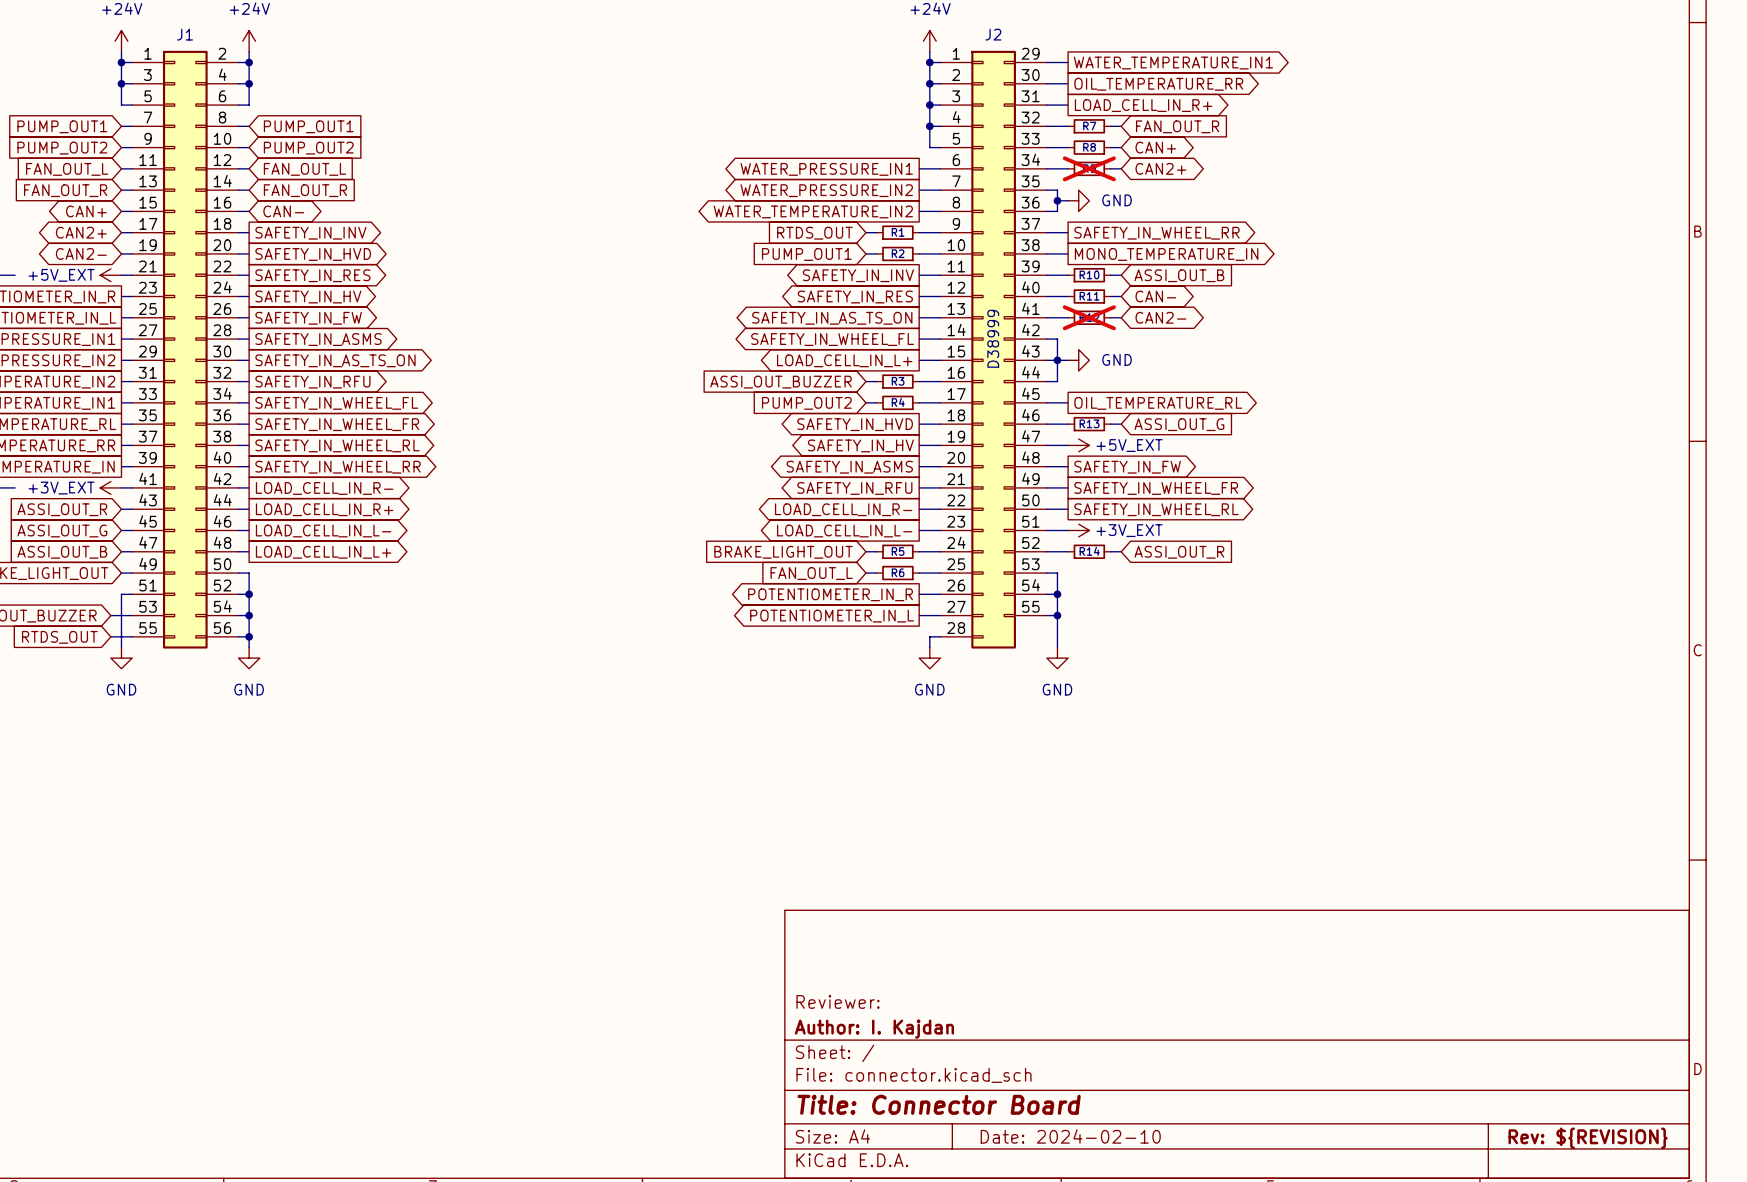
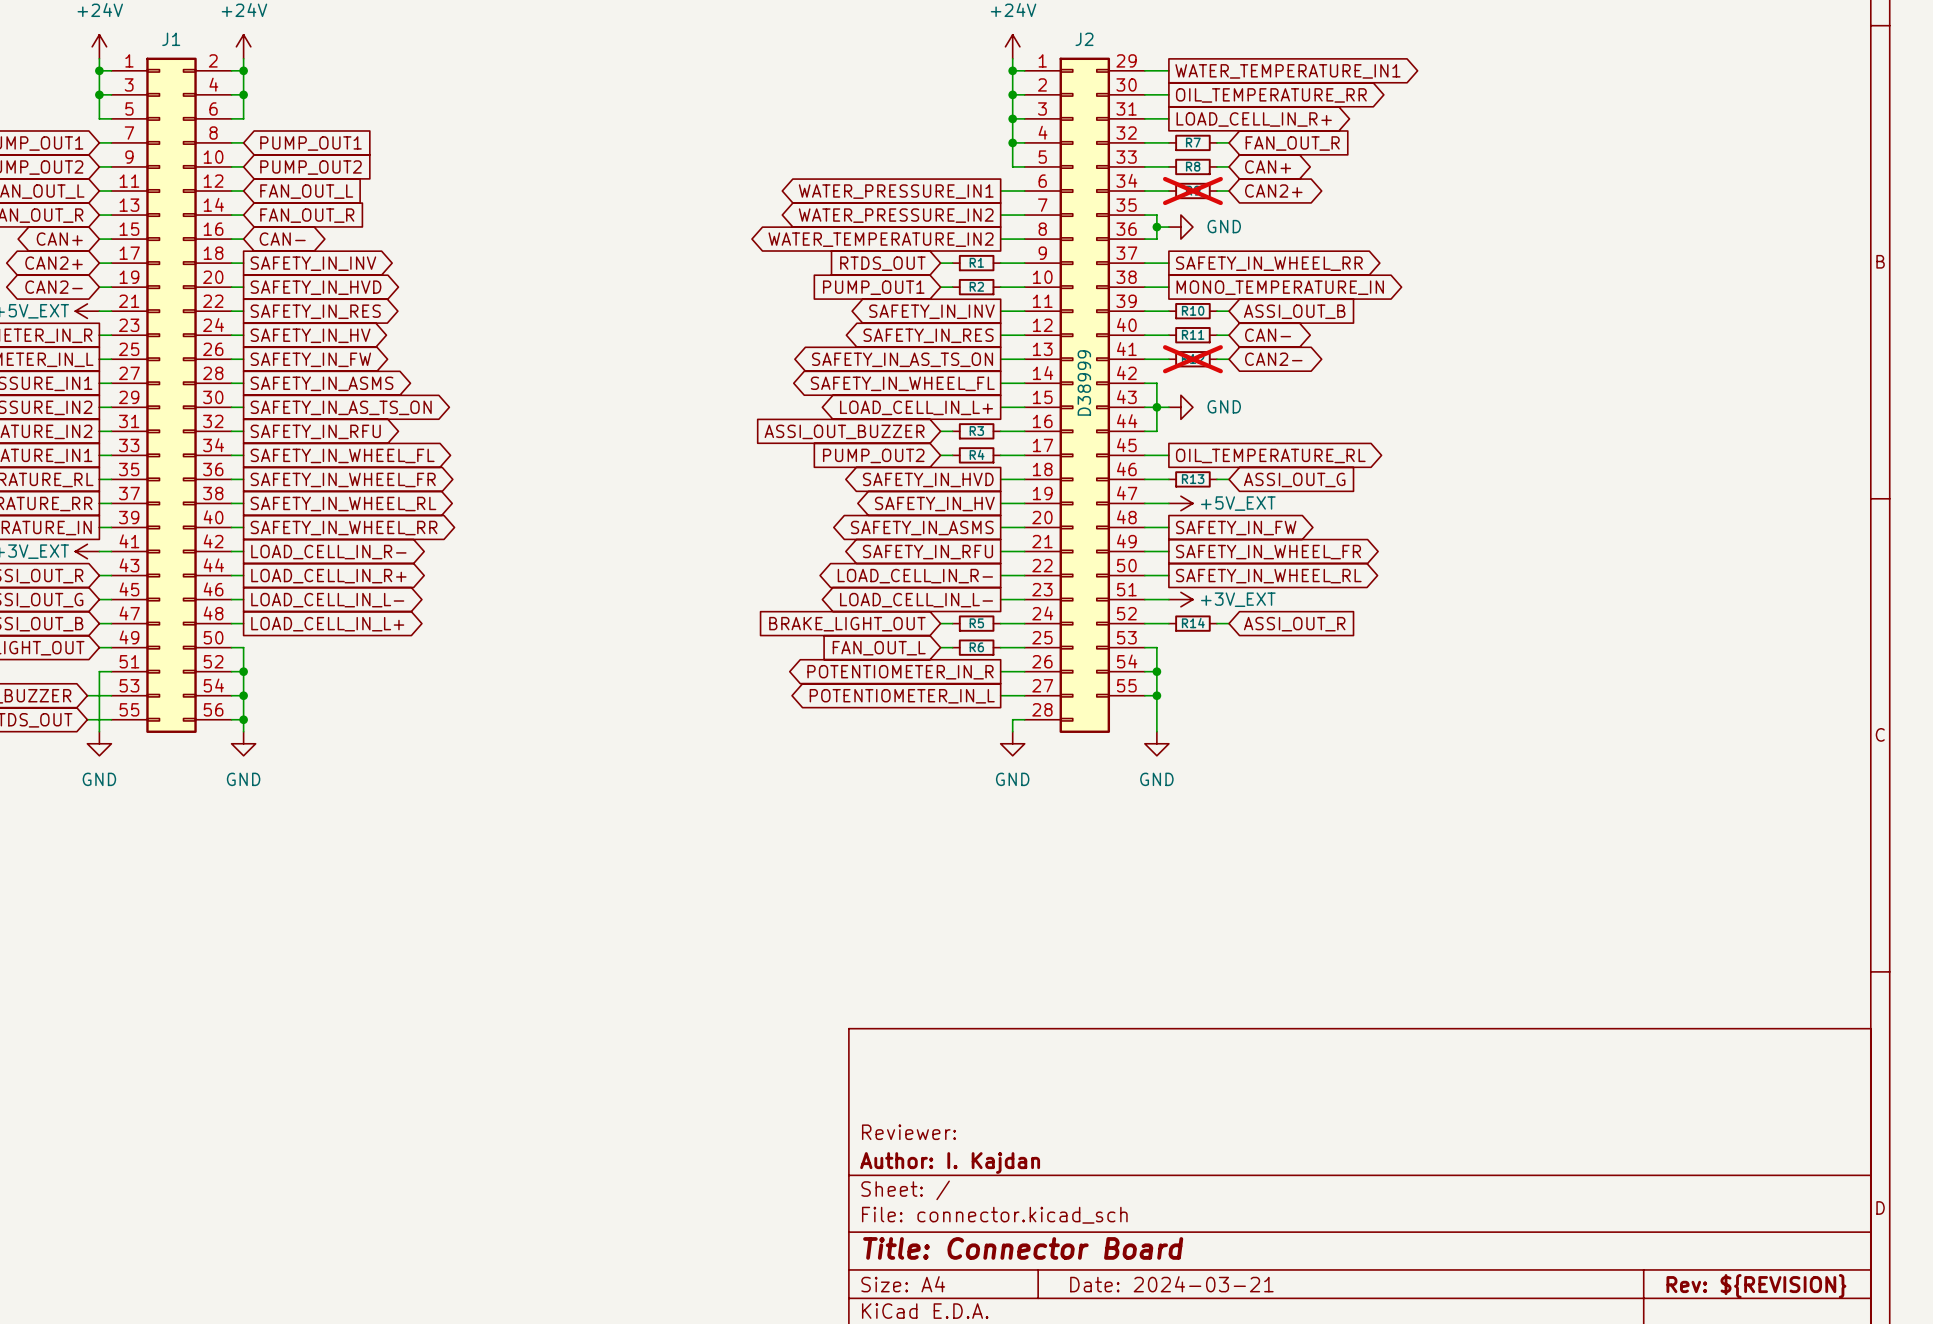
title block: Date: 2024-02-10 (1070, 1136) -> Date: 2024-03-21 (1171, 1284)

